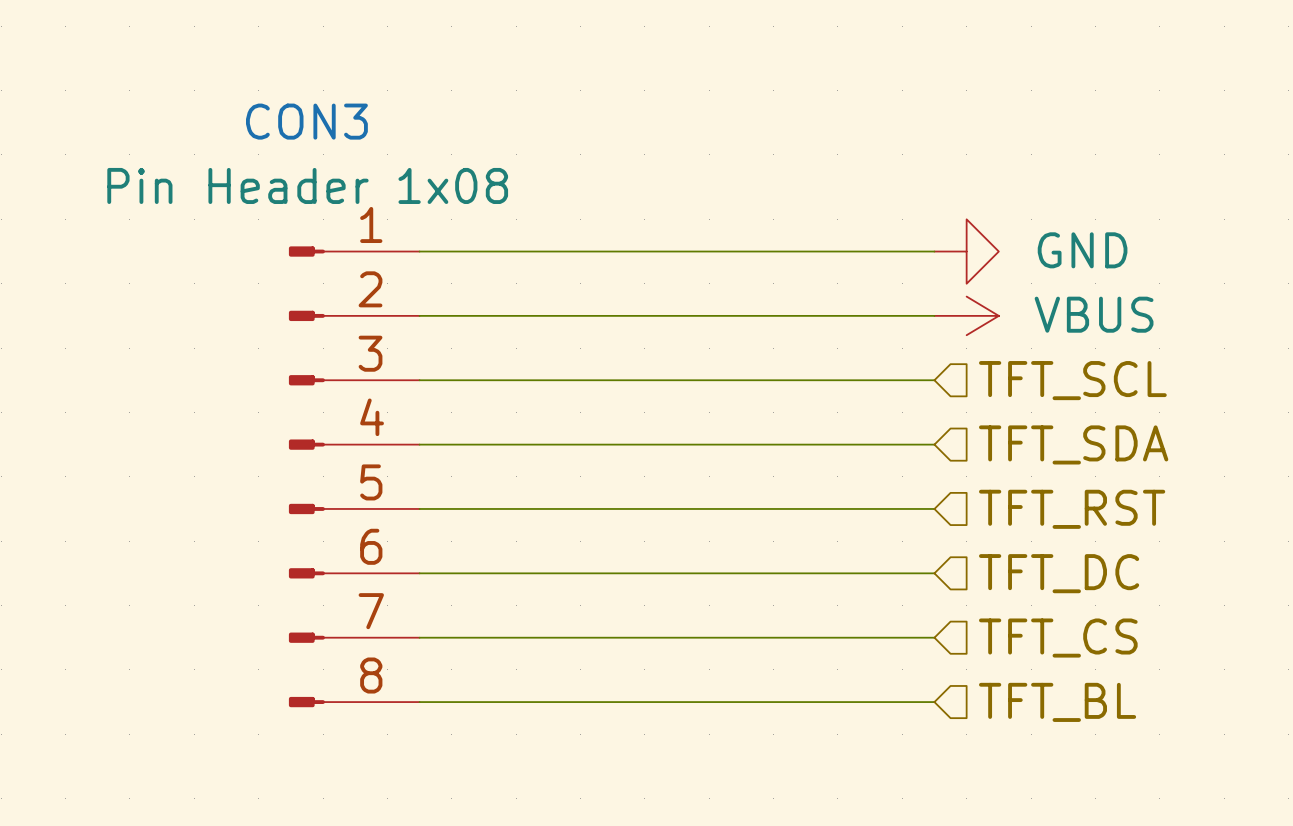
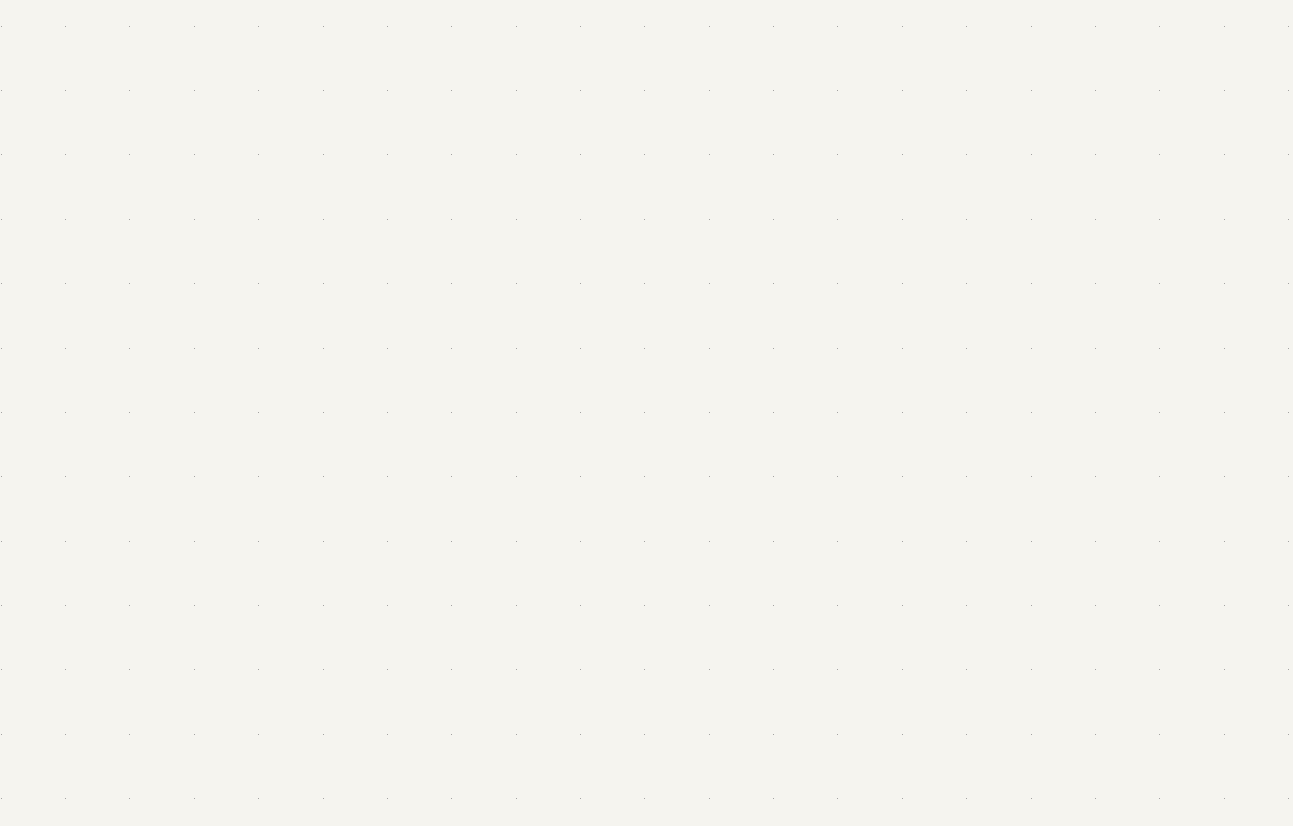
wire: (419, 251) (934, 251) -> none
power symbol: GND (966, 251) -> none
wire: (419, 315) (934, 315) -> none
power symbol: VBUS (966, 315) -> none
wire: (419, 380) (934, 380) -> none
hierarchical label: TFT_SCL (1072, 380) -> none
wire: (419, 444) (934, 444) -> none
hierarchical label: TFT_SDA (1073, 444) -> none
CON3: Pin Header 1x08 (354, 476) -> none
wire: (419, 508) (934, 508) -> none
hierarchical label: TFT_RST (1072, 509) -> none
wire: (419, 573) (934, 573) -> none
hierarchical label: TFT_DC (1059, 573) -> none
wire: (419, 637) (934, 637) -> none
hierarchical label: TFT_CS (1058, 638) -> none
wire: (419, 702) (934, 702) -> none
hierarchical label: TFT_BL (1057, 702) -> none

